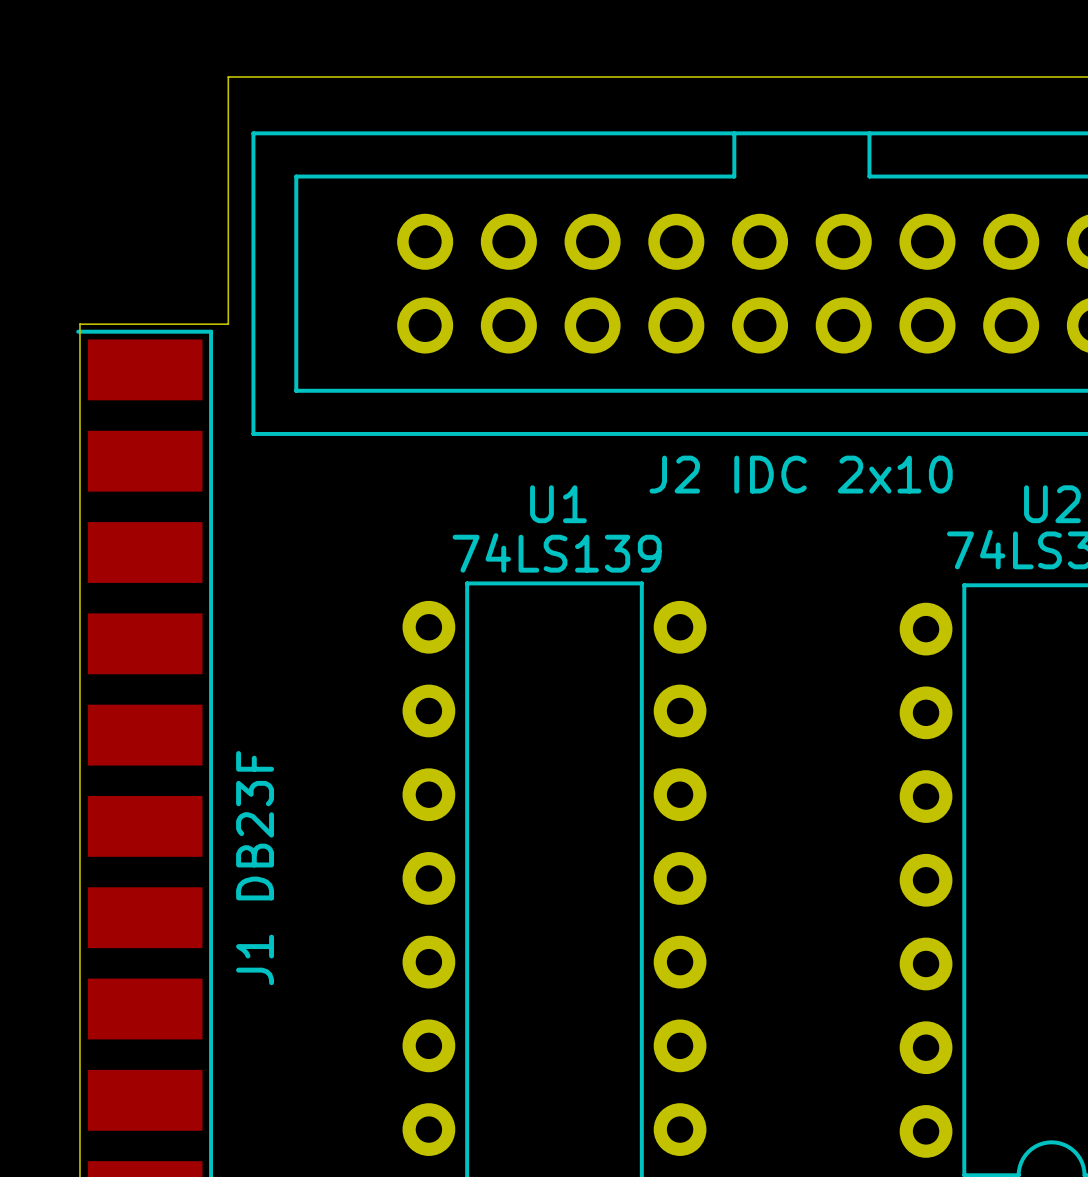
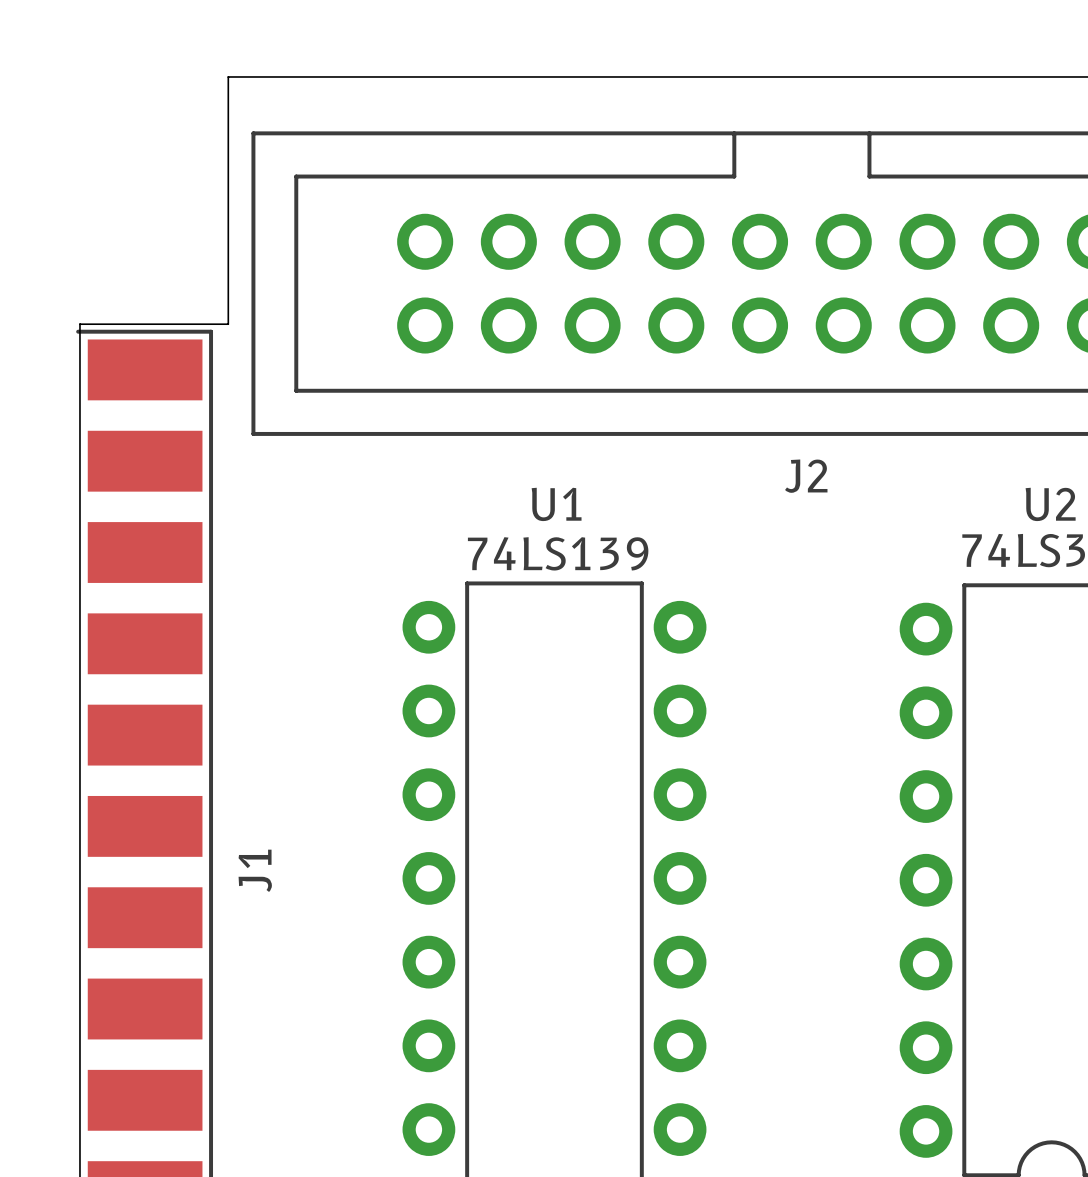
J2 text: J2 IDC 2x10 (801, 474) -> none
J2 name: none -> J2 (806, 476)
J1 text: J1 DB23F (255, 868) -> none
J1 name: none -> J1 (255, 870)

